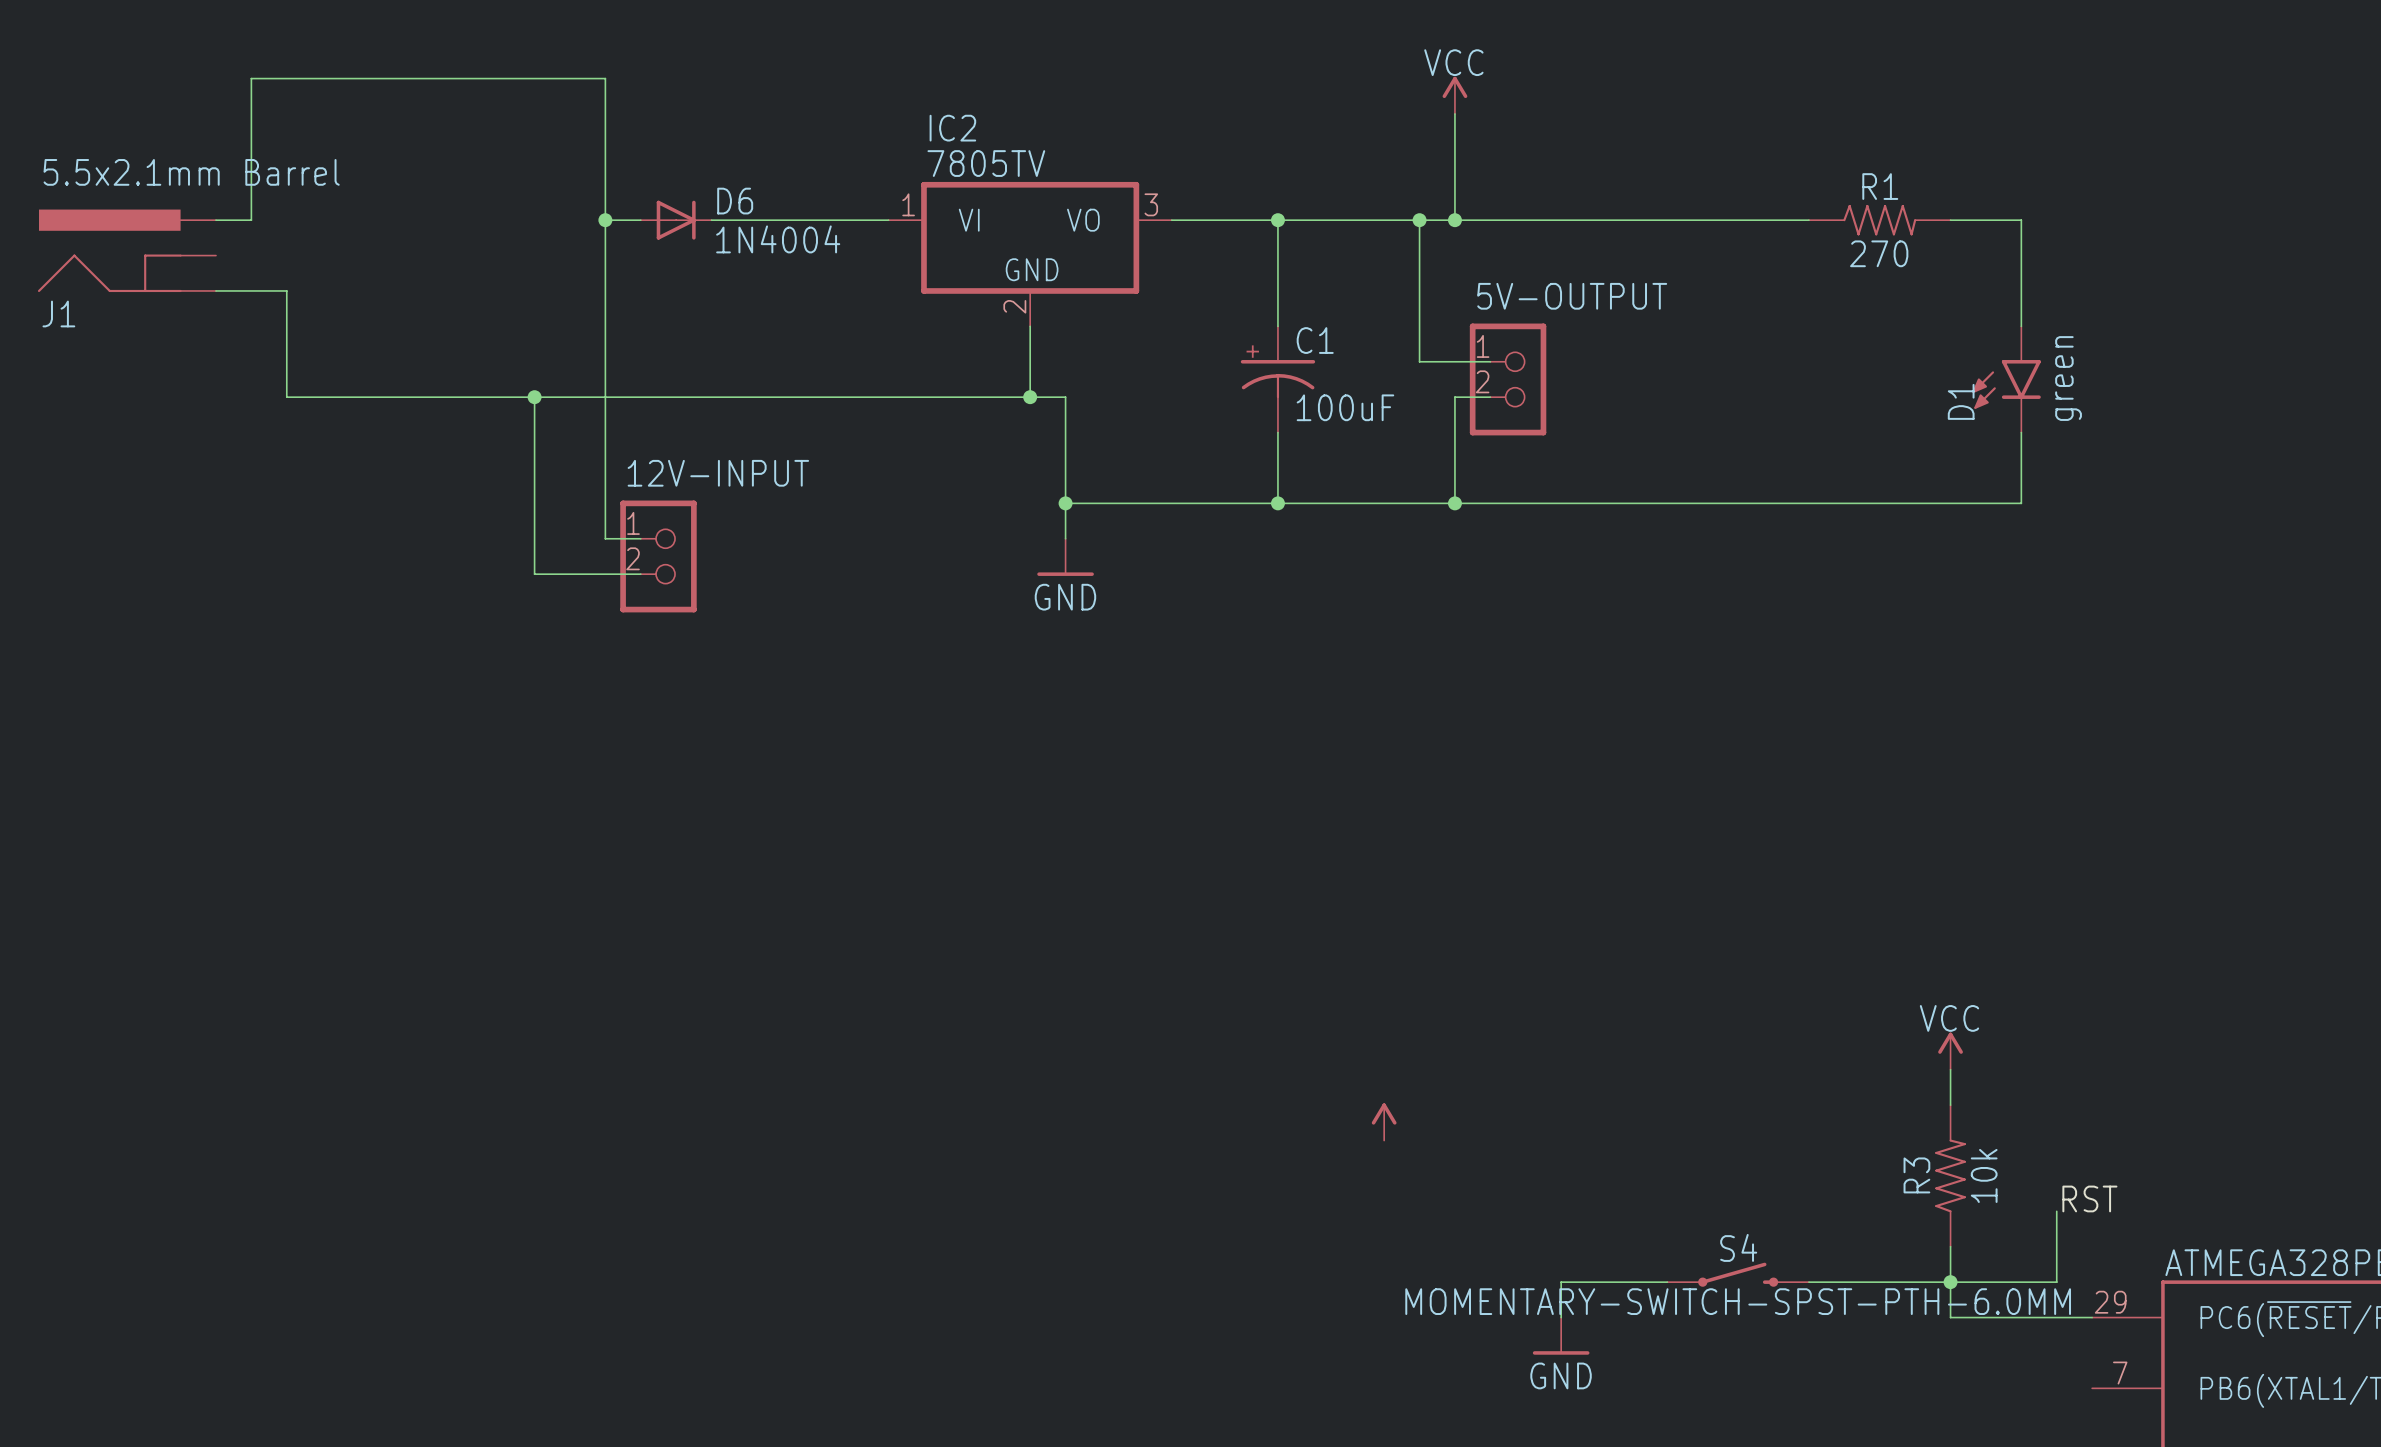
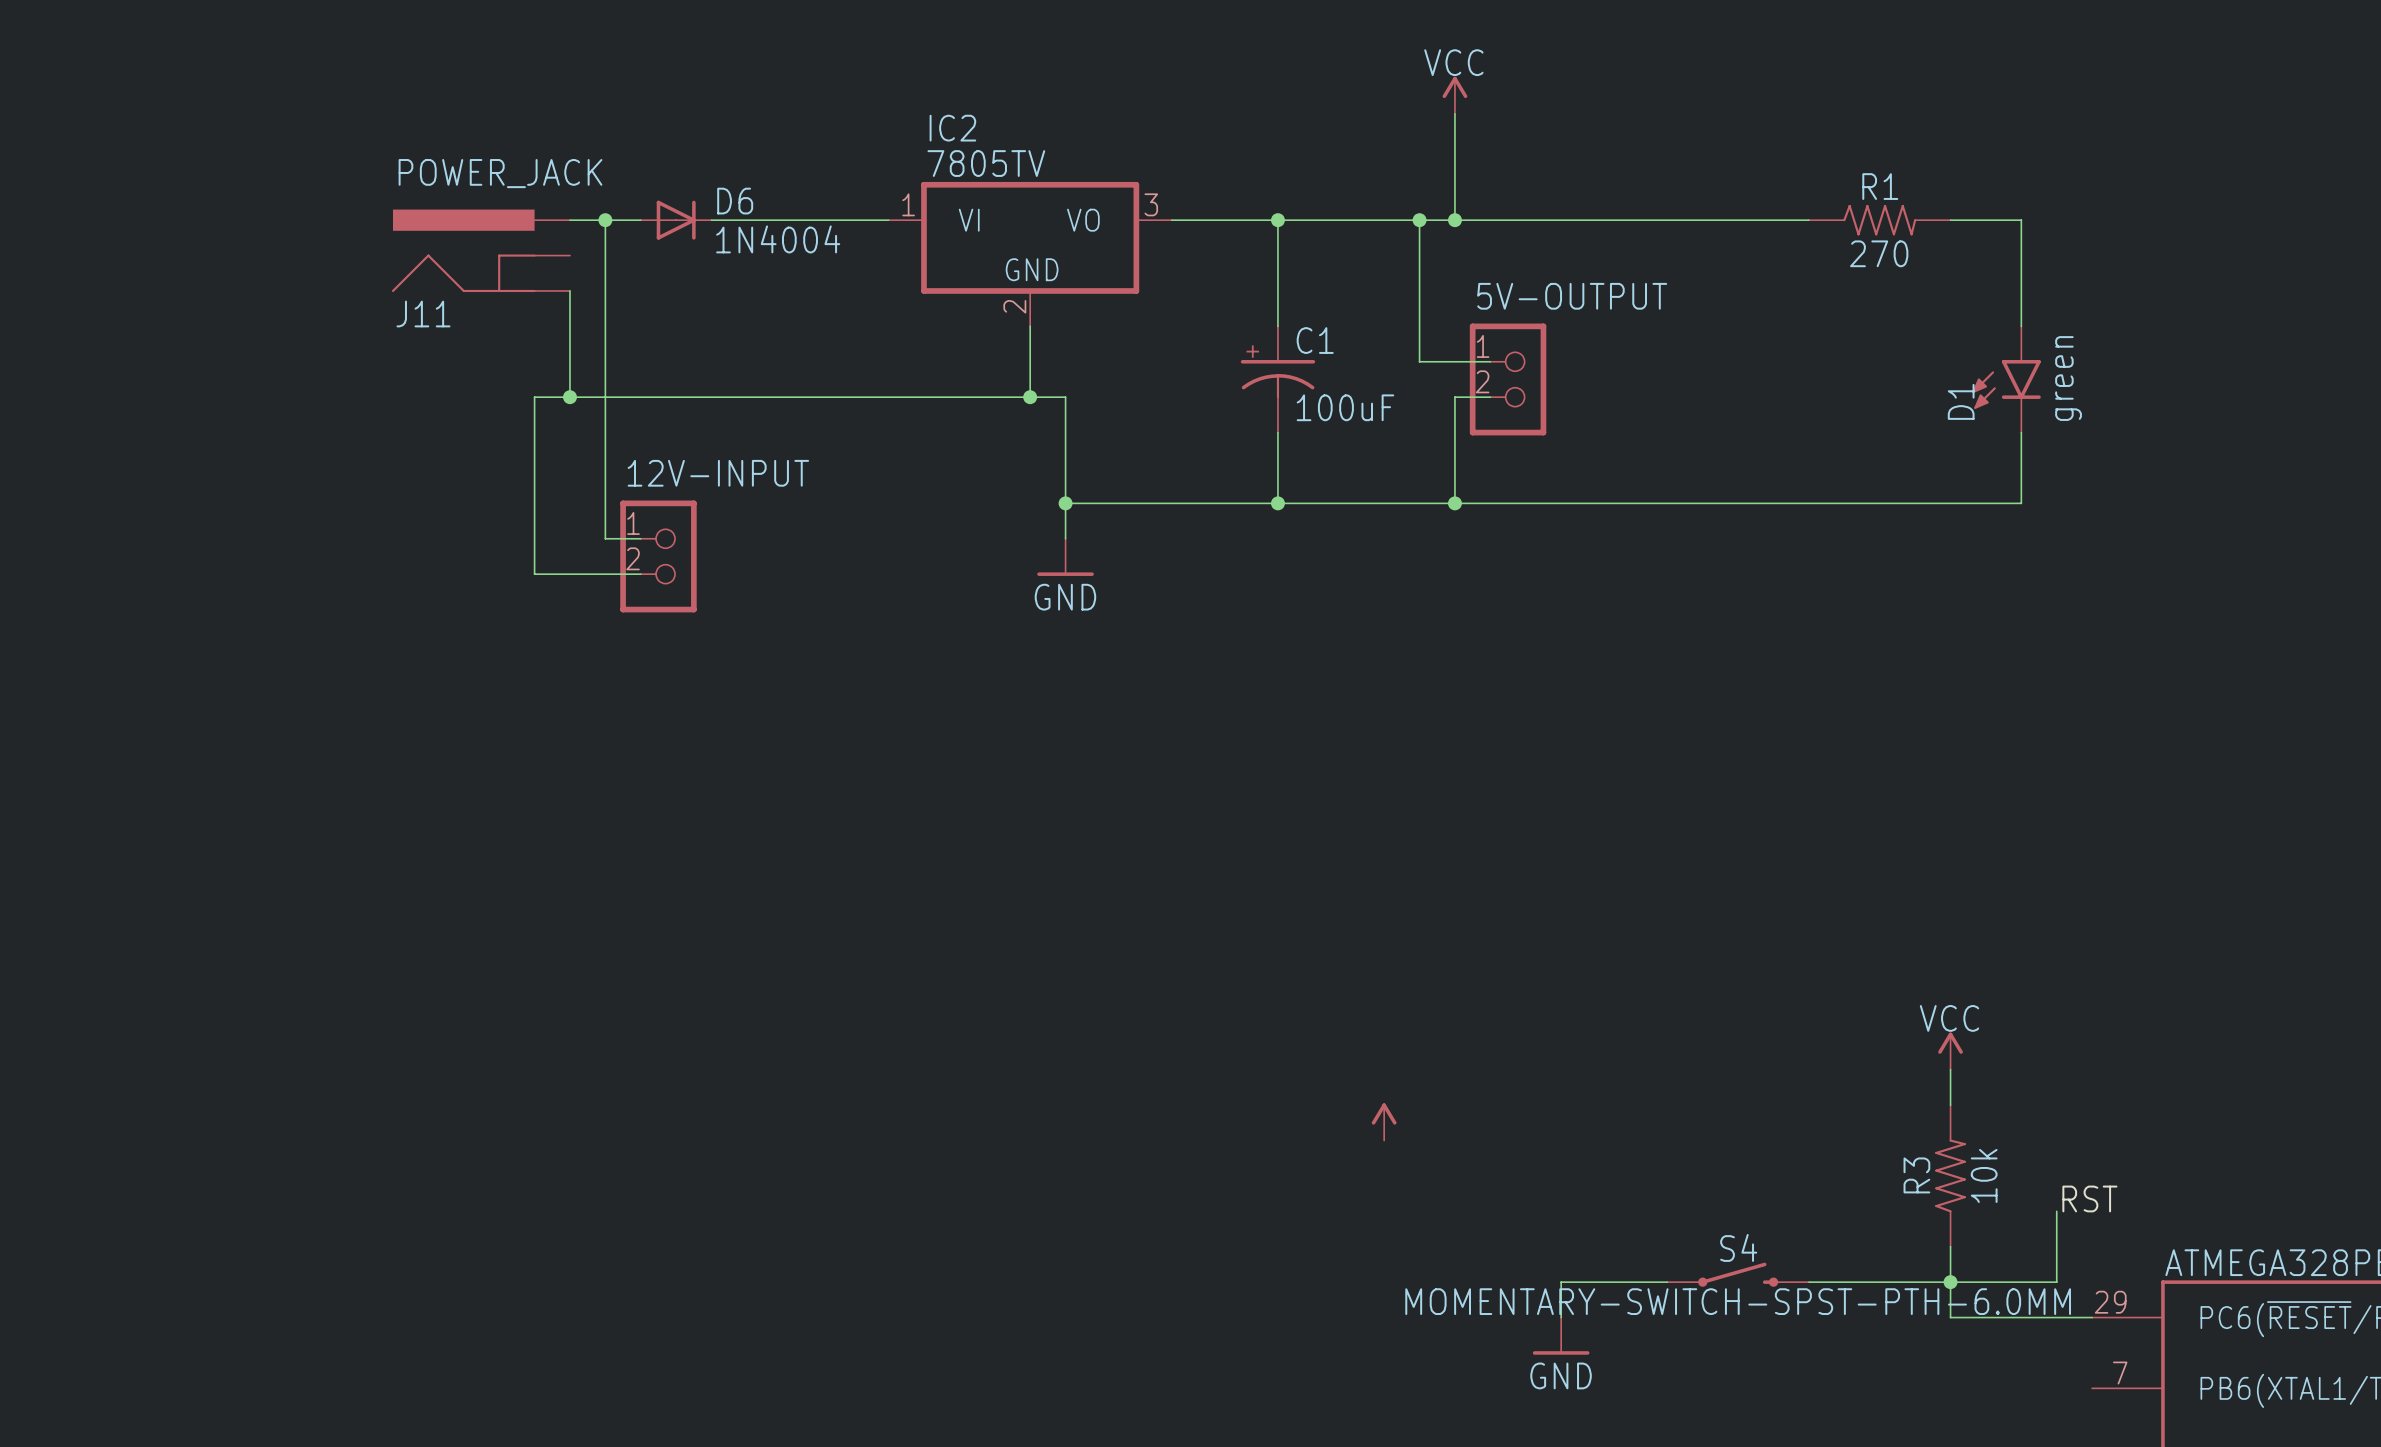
wire: (215, 220) (251, 220) (251, 78) (605, 78) (605, 220) -> (569, 220) (605, 220)
J1: 5.5x2.1mm Barrel (126, 250) -> none
J11: none -> POWER_JACK (480, 250)
wire: (215, 290) (286, 290) (286, 397) (534, 397) -> none
wire: none -> (569, 290) (569, 397)
junction position: (534, 397) -> (569, 397)

